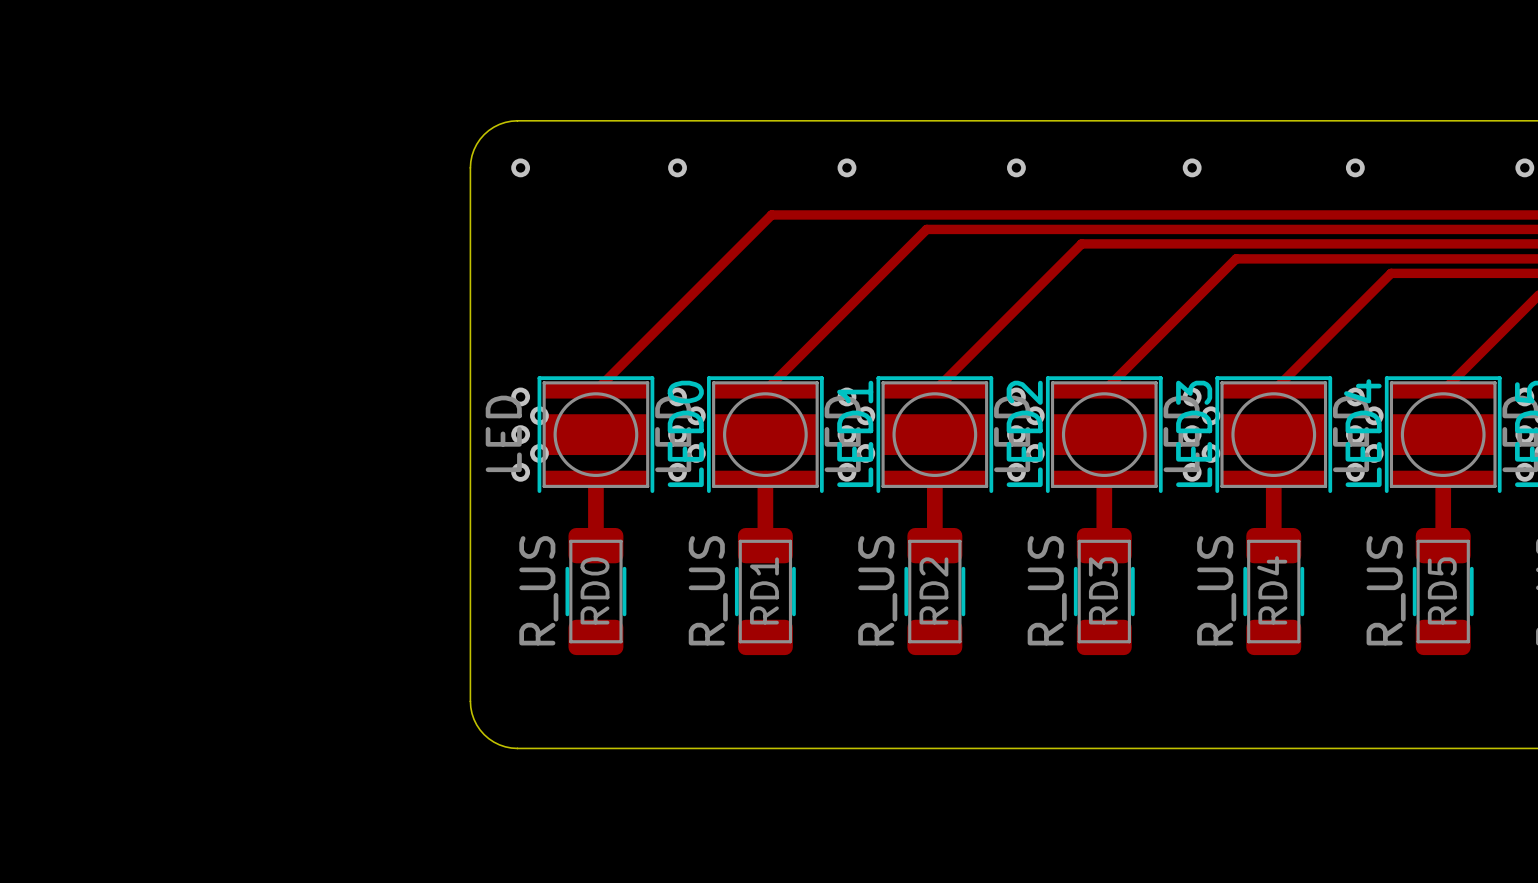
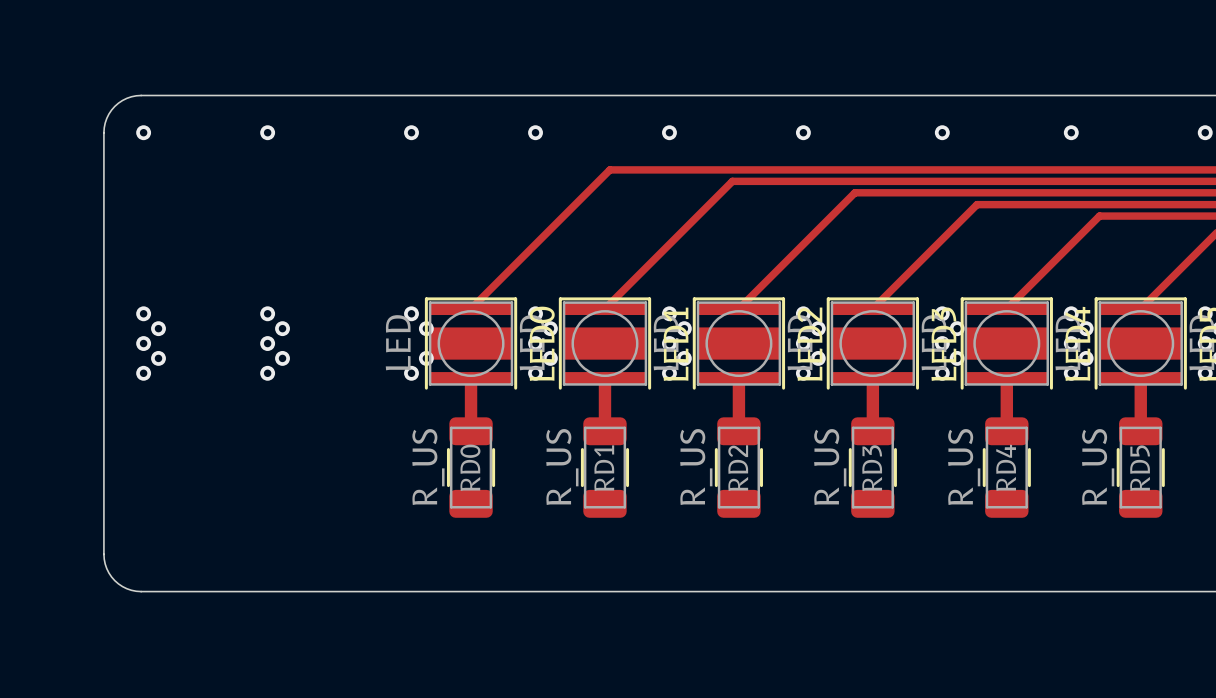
board edge: (517, 120) (499, 124) (484, 134) (473, 149) (470, 167) (470, 707) (473, 719) (484, 734) (499, 744) (517, 748) -> (409, 95) (136, 95) (126, 98) (114, 106) (106, 118) (103, 132) (103, 554) (108, 572) (122, 586) (141, 591) (409, 591)
via: none -> (143, 132)
via: none -> (267, 132)
via: none -> (143, 313)
via: none -> (267, 313)
via: none -> (158, 328)
via: none -> (282, 328)
via: none -> (143, 343)
via: none -> (267, 343)
via: (520, 434) -> none
via: none -> (158, 358)
via: none -> (282, 358)
via: none -> (143, 373)
via: none -> (267, 373)

